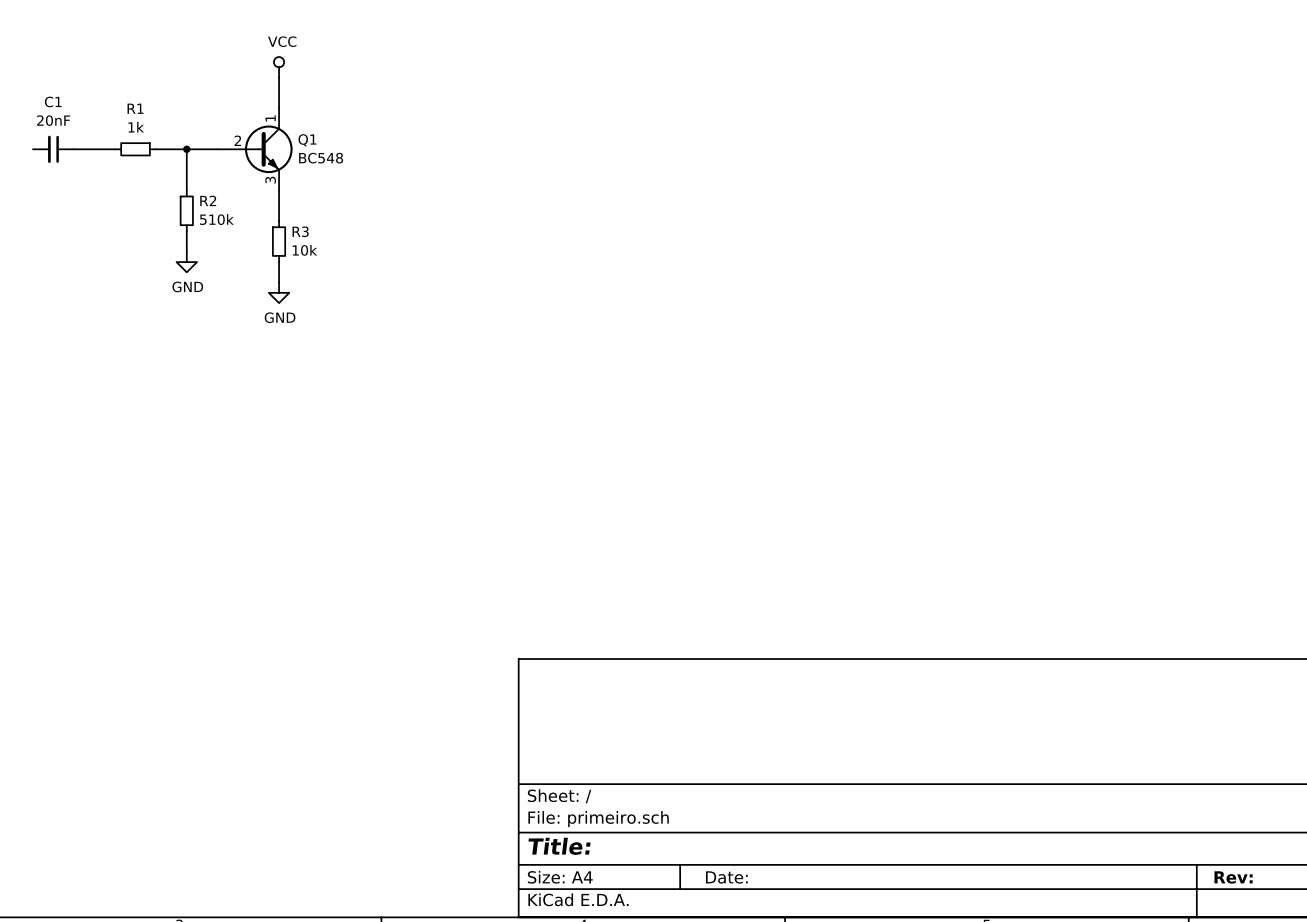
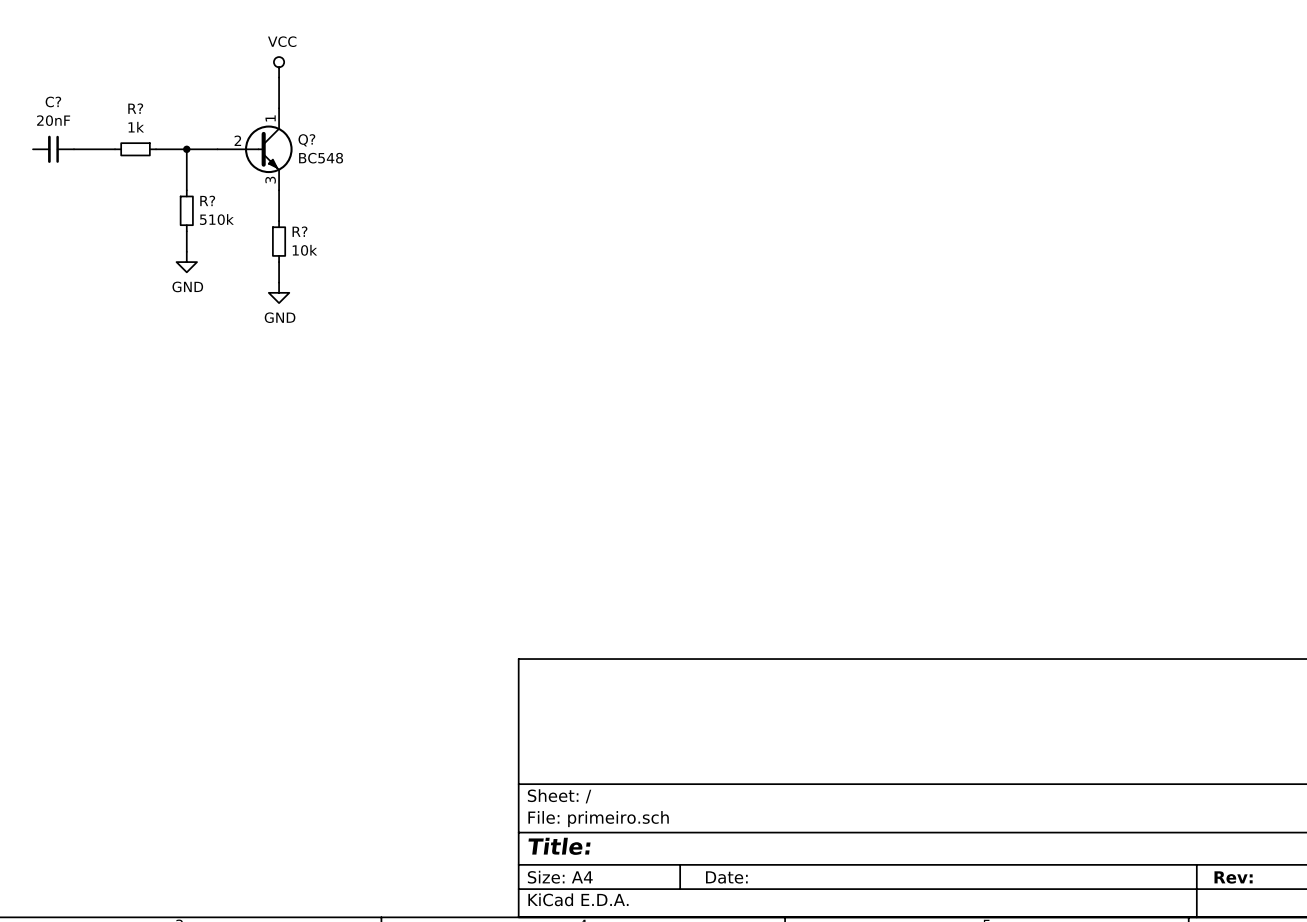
C1 name: C1 (53, 101) -> C? (53, 101)
R1 name: R1 (135, 108) -> R? (135, 108)
Q1 name: Q1 (307, 140) -> Q? (306, 140)
R2 name: R2 (208, 200) -> R? (207, 200)
R3 name: R3 (300, 231) -> R? (299, 231)

